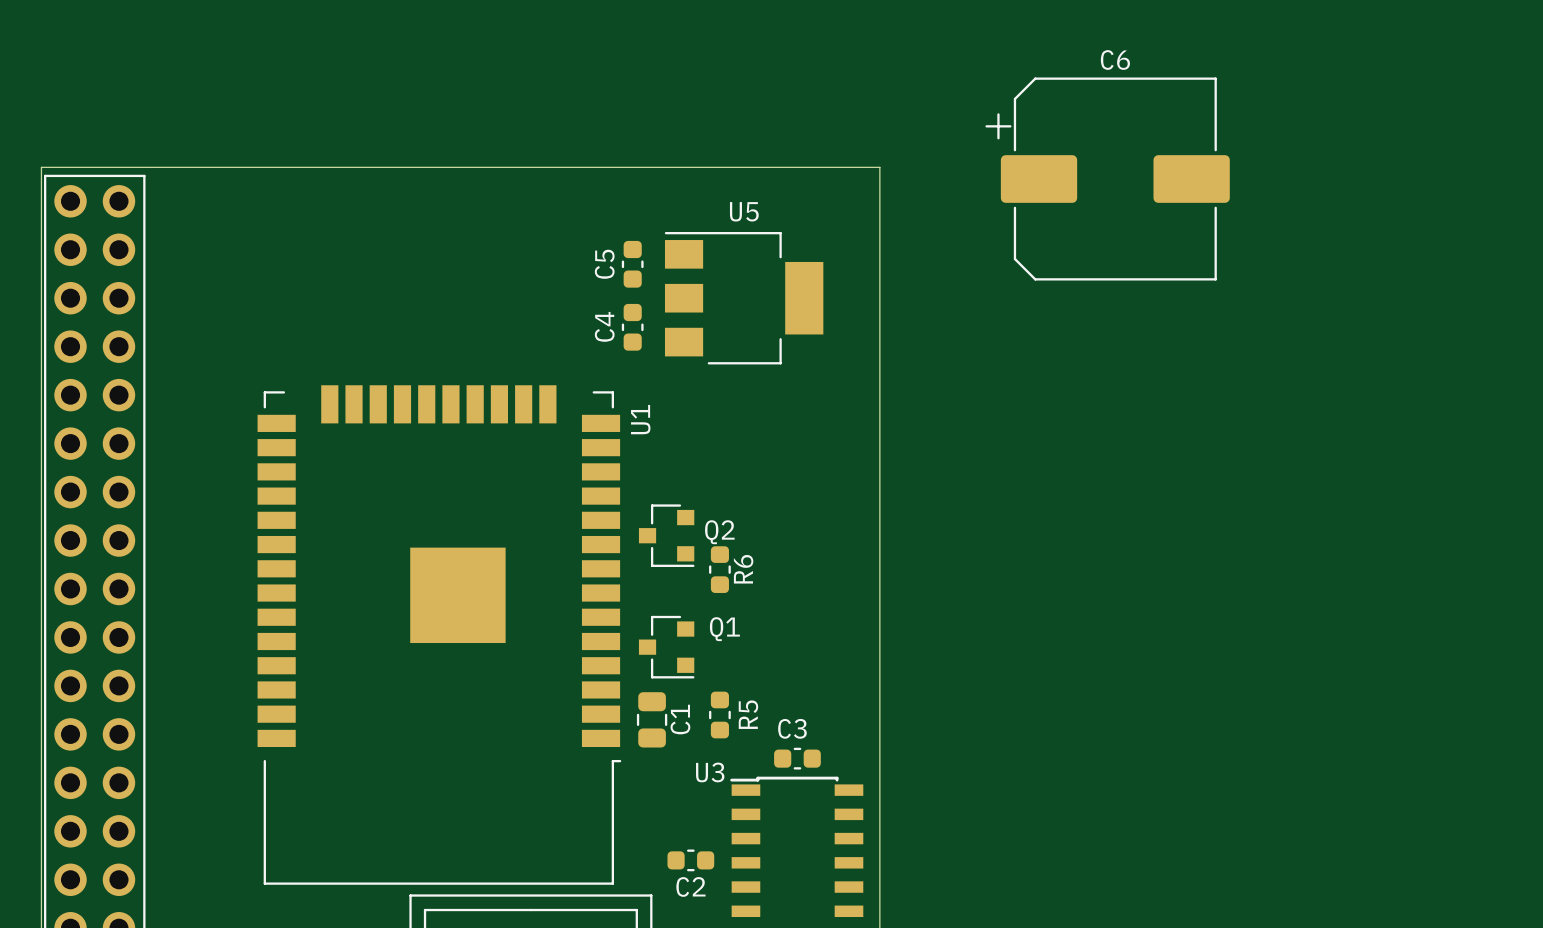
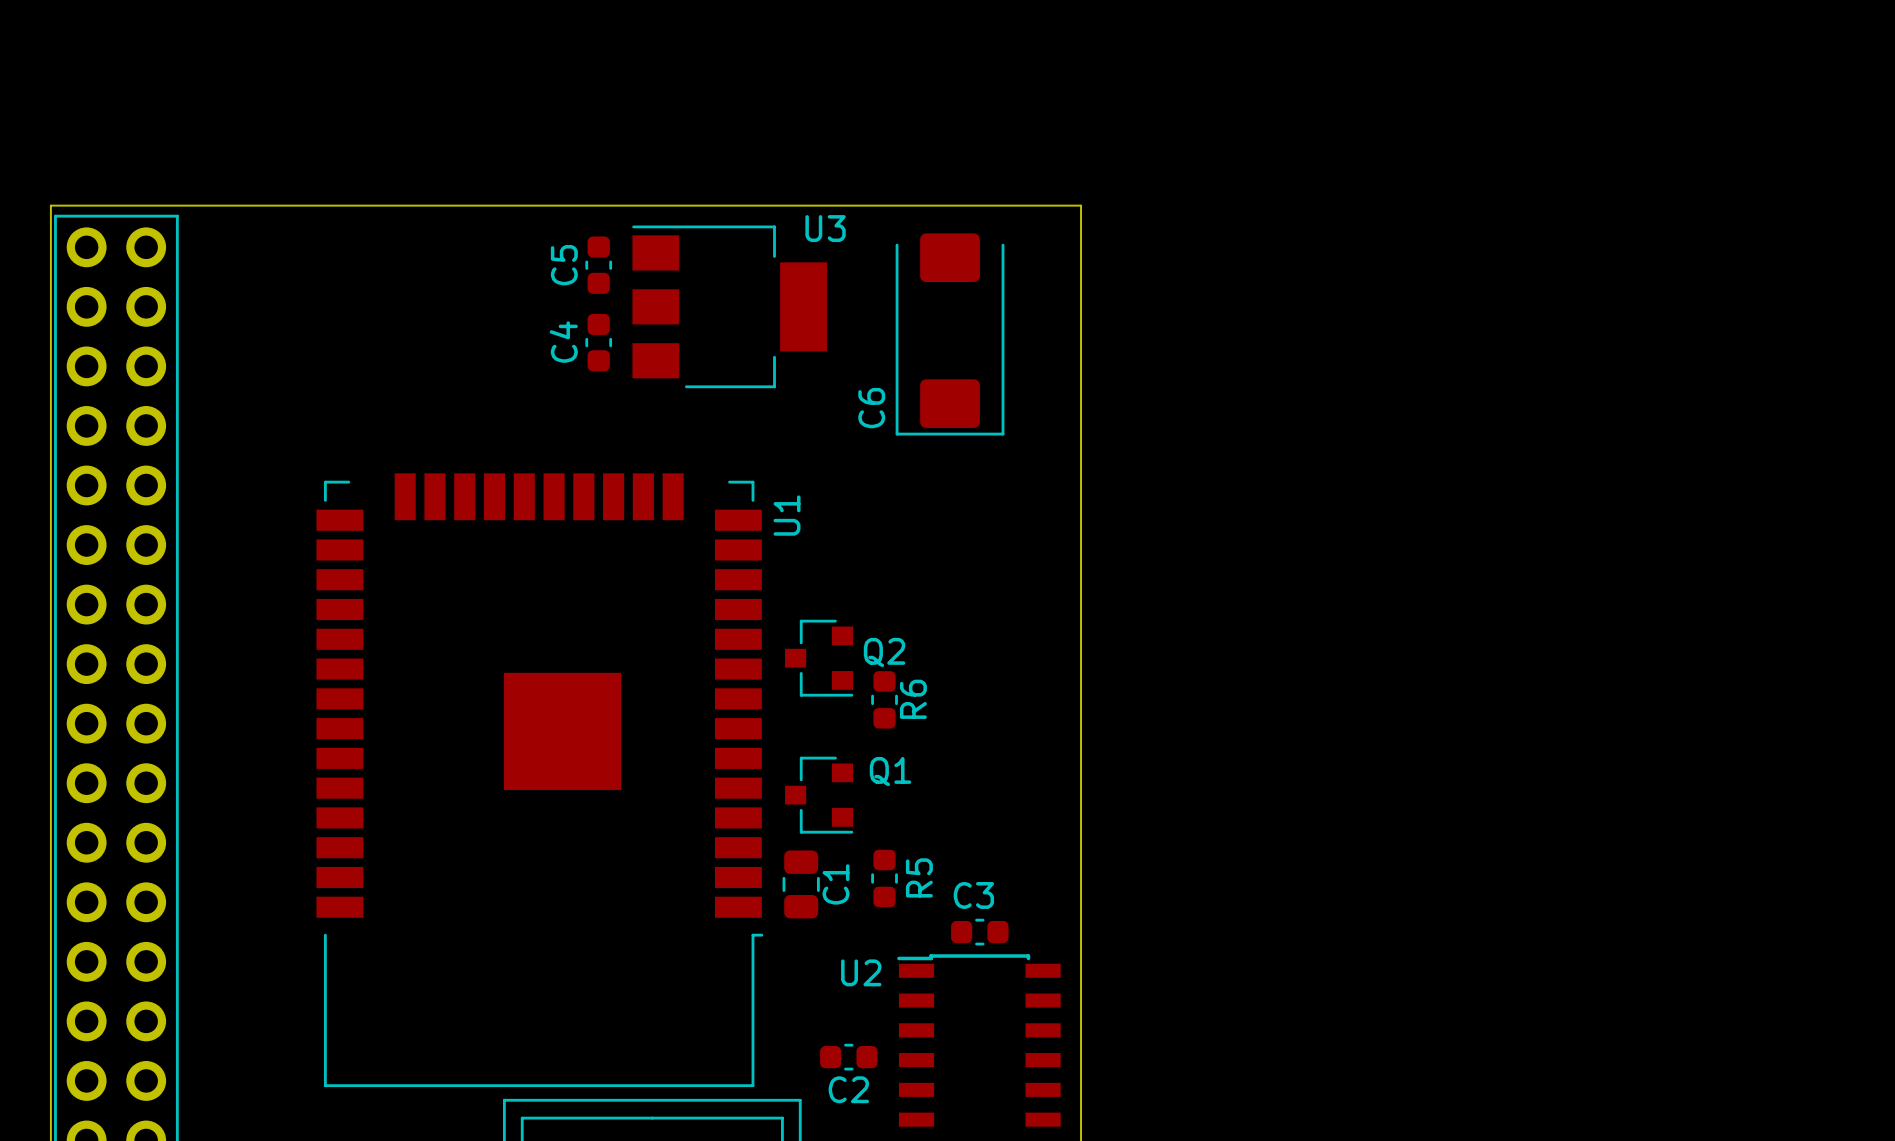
C6 name position: C6 (1115, 59) -> C6 (871, 408)
C6 footprint: [985, 77, 1230, 281] -> [895, 233, 1005, 436]
U3: none -> (729, 306)
C5 position: (632, 264) -> (598, 265)
U5: (744, 298) -> none
C4 position: (632, 327) -> (598, 342)
U3 name: U3 (710, 772) -> U2 (861, 972)

